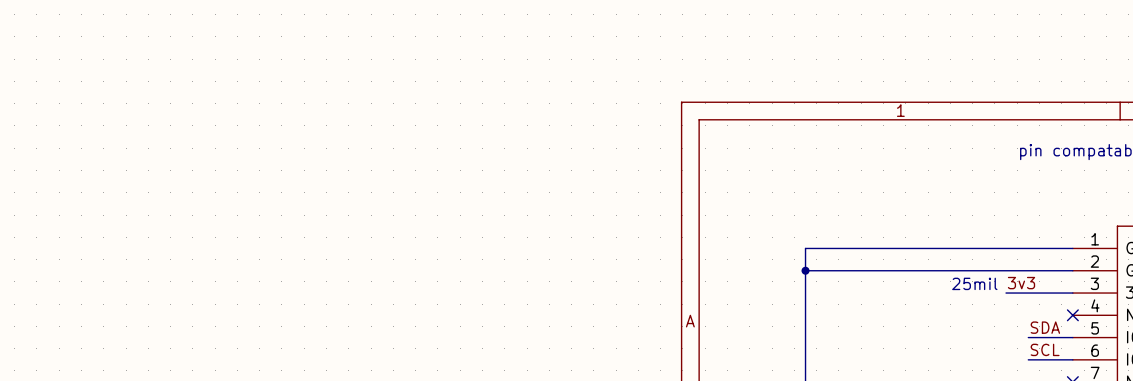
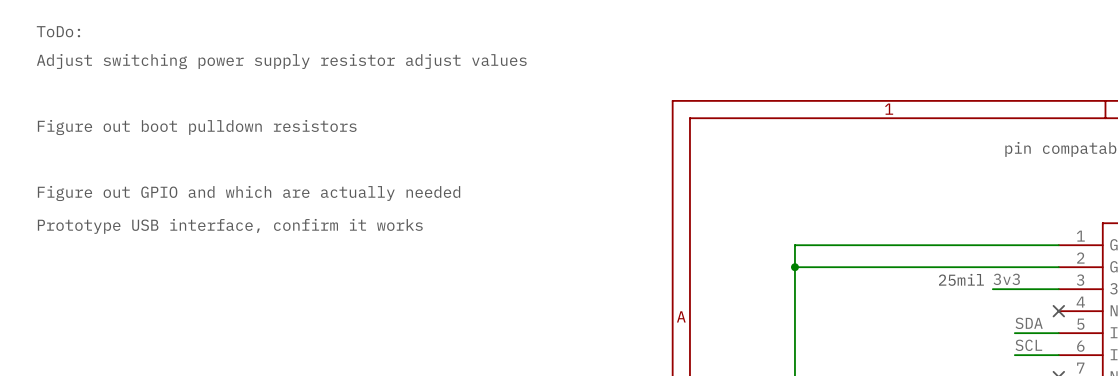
text: none -> ToDo: (58, 31)
text: none -> Adjust switching power supply resistor adjust values (281, 61)
text: none -> Figure out boot pulldown resistors (197, 127)
text: none -> Figure out GPIO and which are actually needed (249, 193)
text: none -> Prototype USB interface, confirm it works (230, 226)

